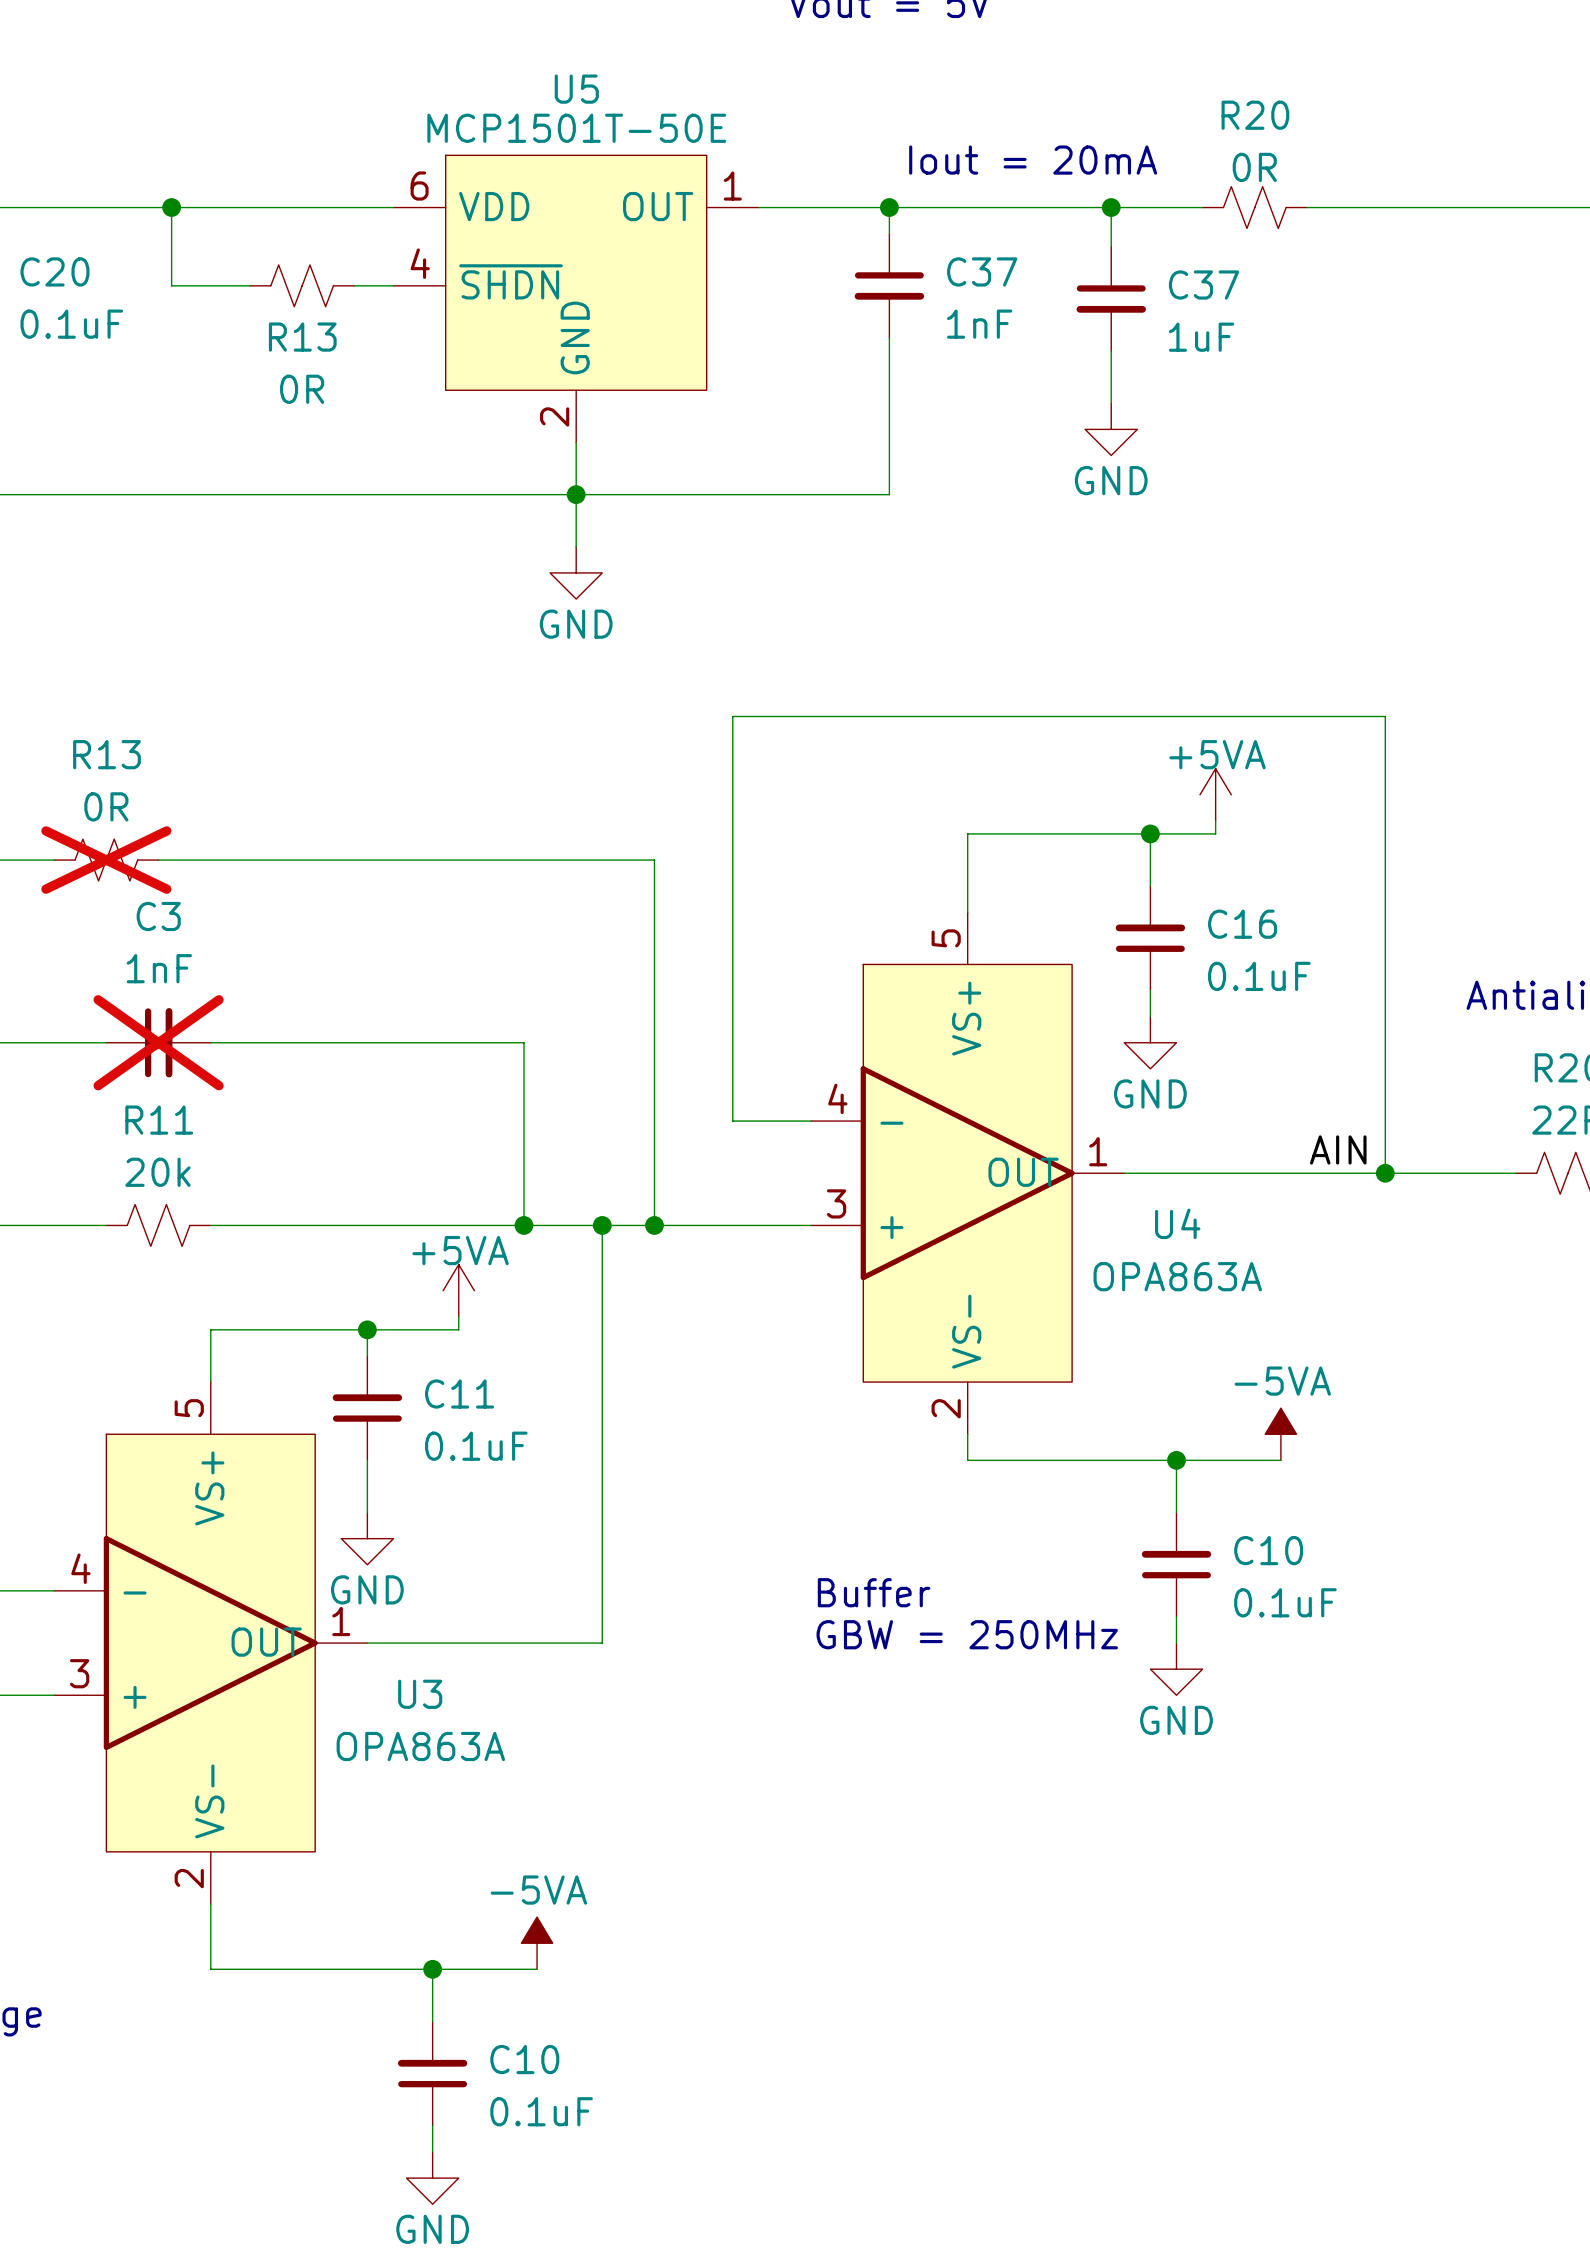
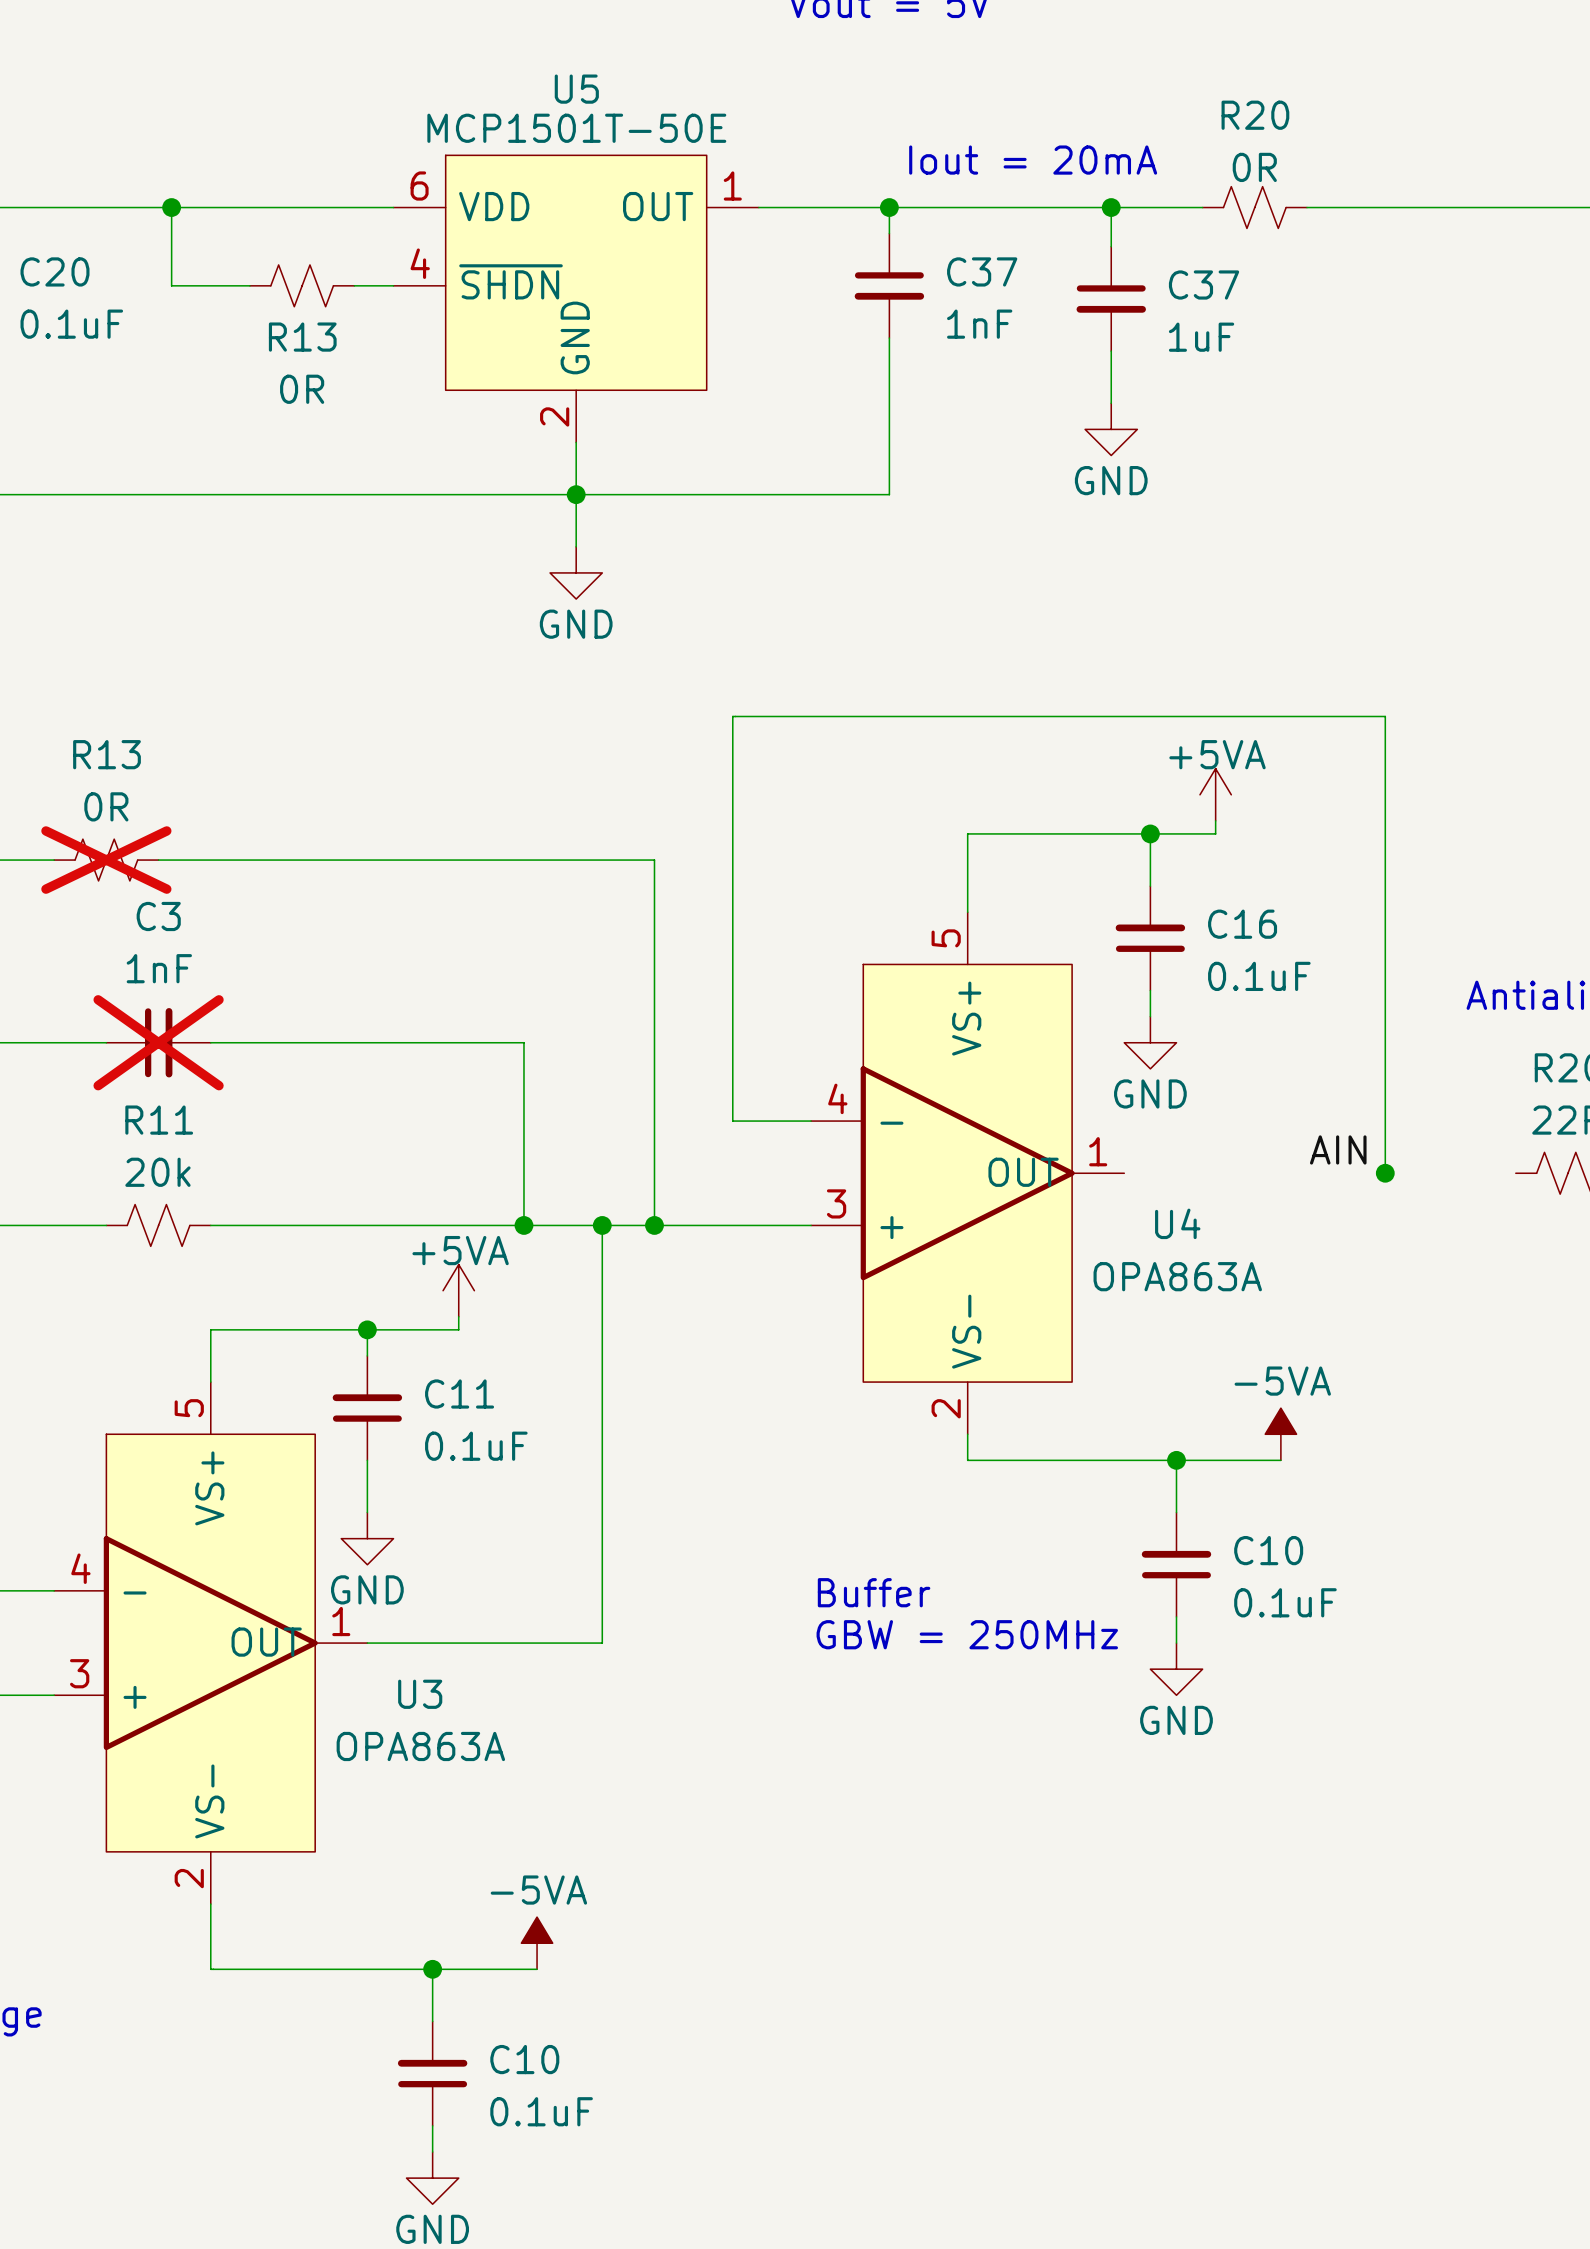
wire: (1124, 1173) (1515, 1173) -> none

